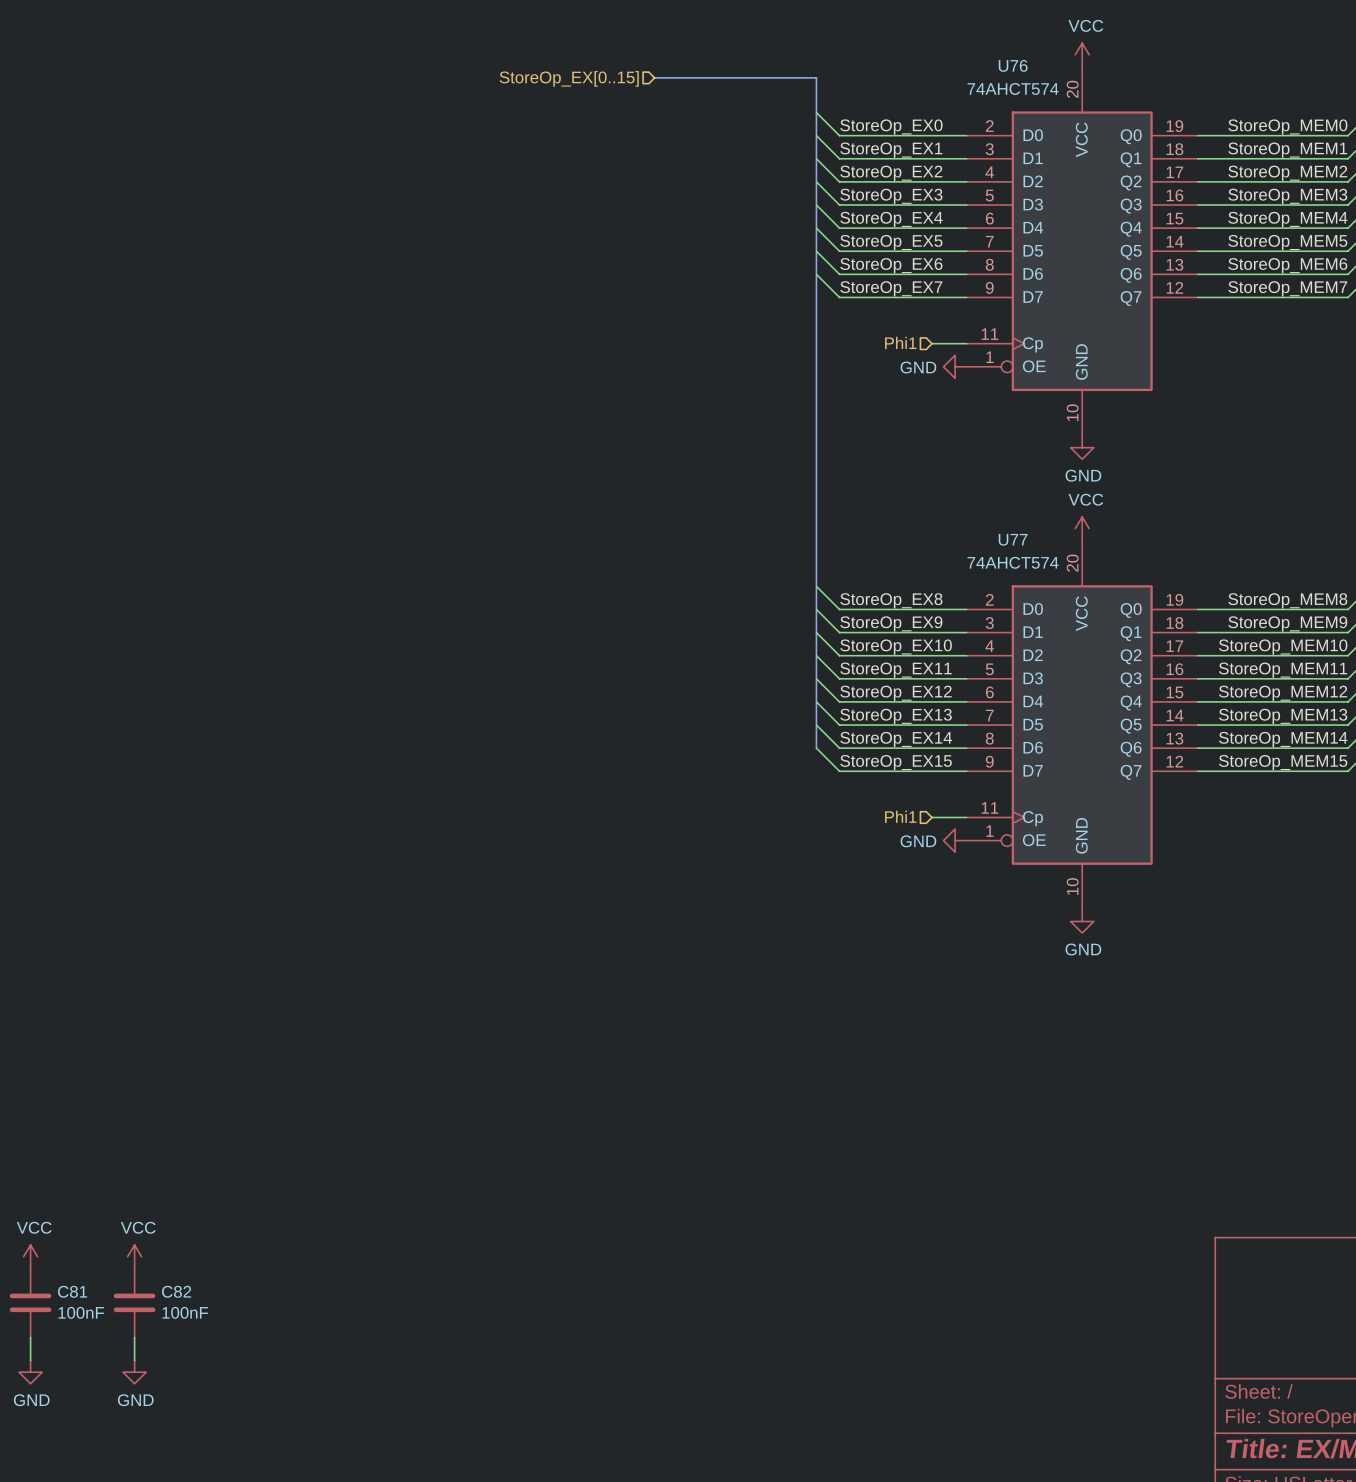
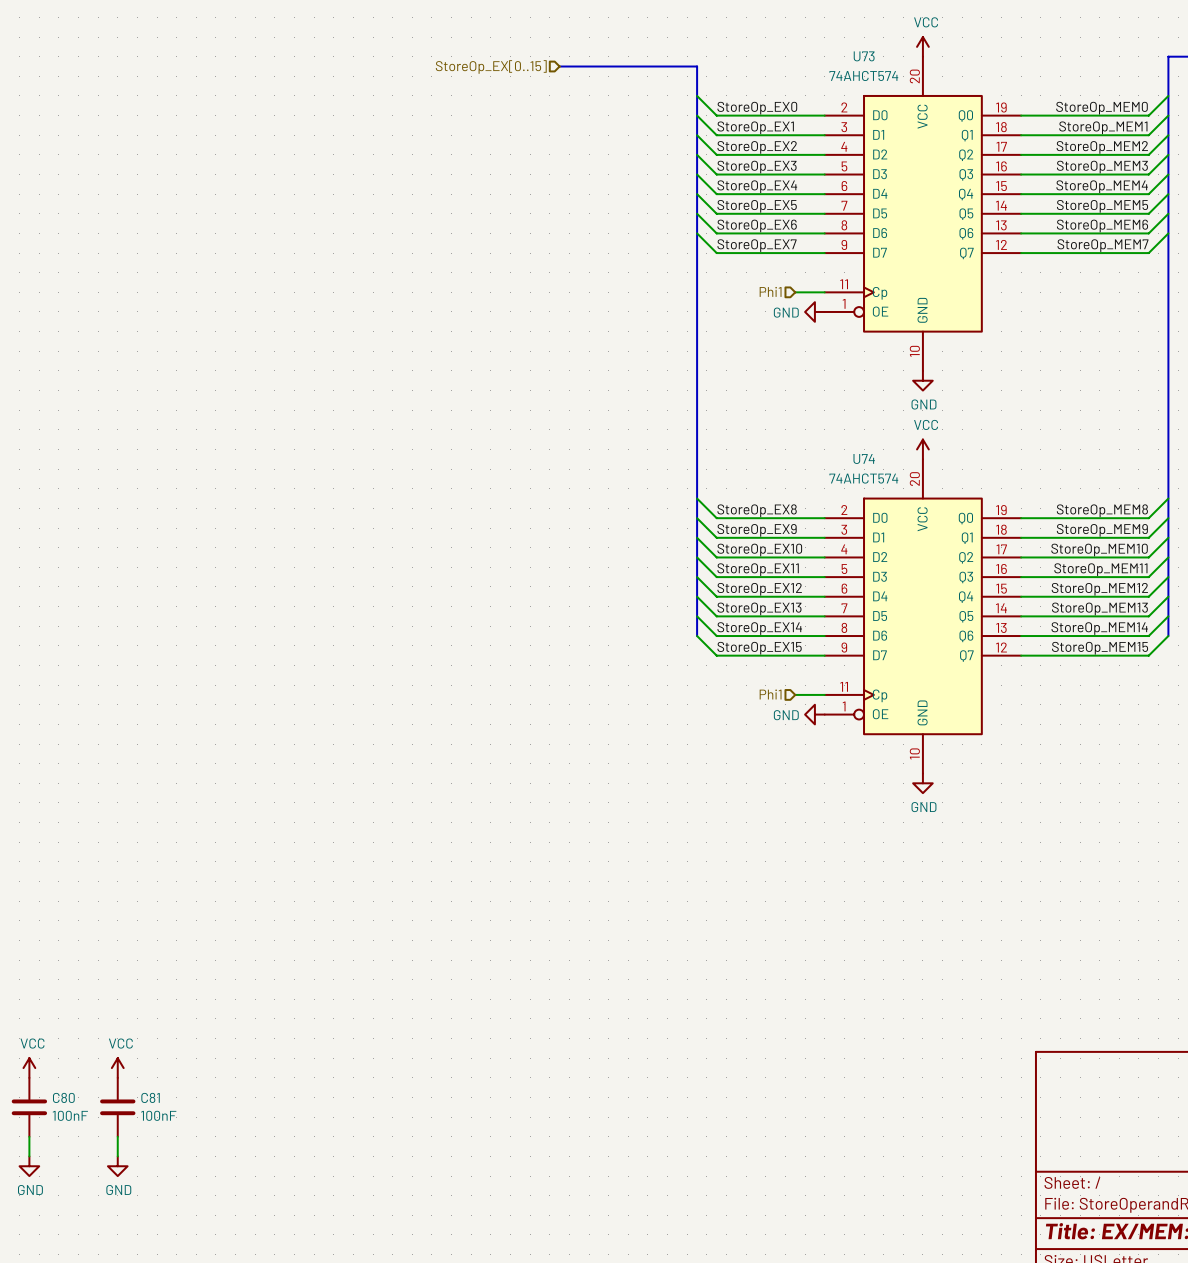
U76 name: U76 (1013, 65) -> U73 (864, 56)
U77 name: U77 (1013, 539) -> U74 (864, 458)
C81 name: C81 (72, 1291) -> C80 (63, 1097)
C82 name: C82 (176, 1291) -> C81 (150, 1097)

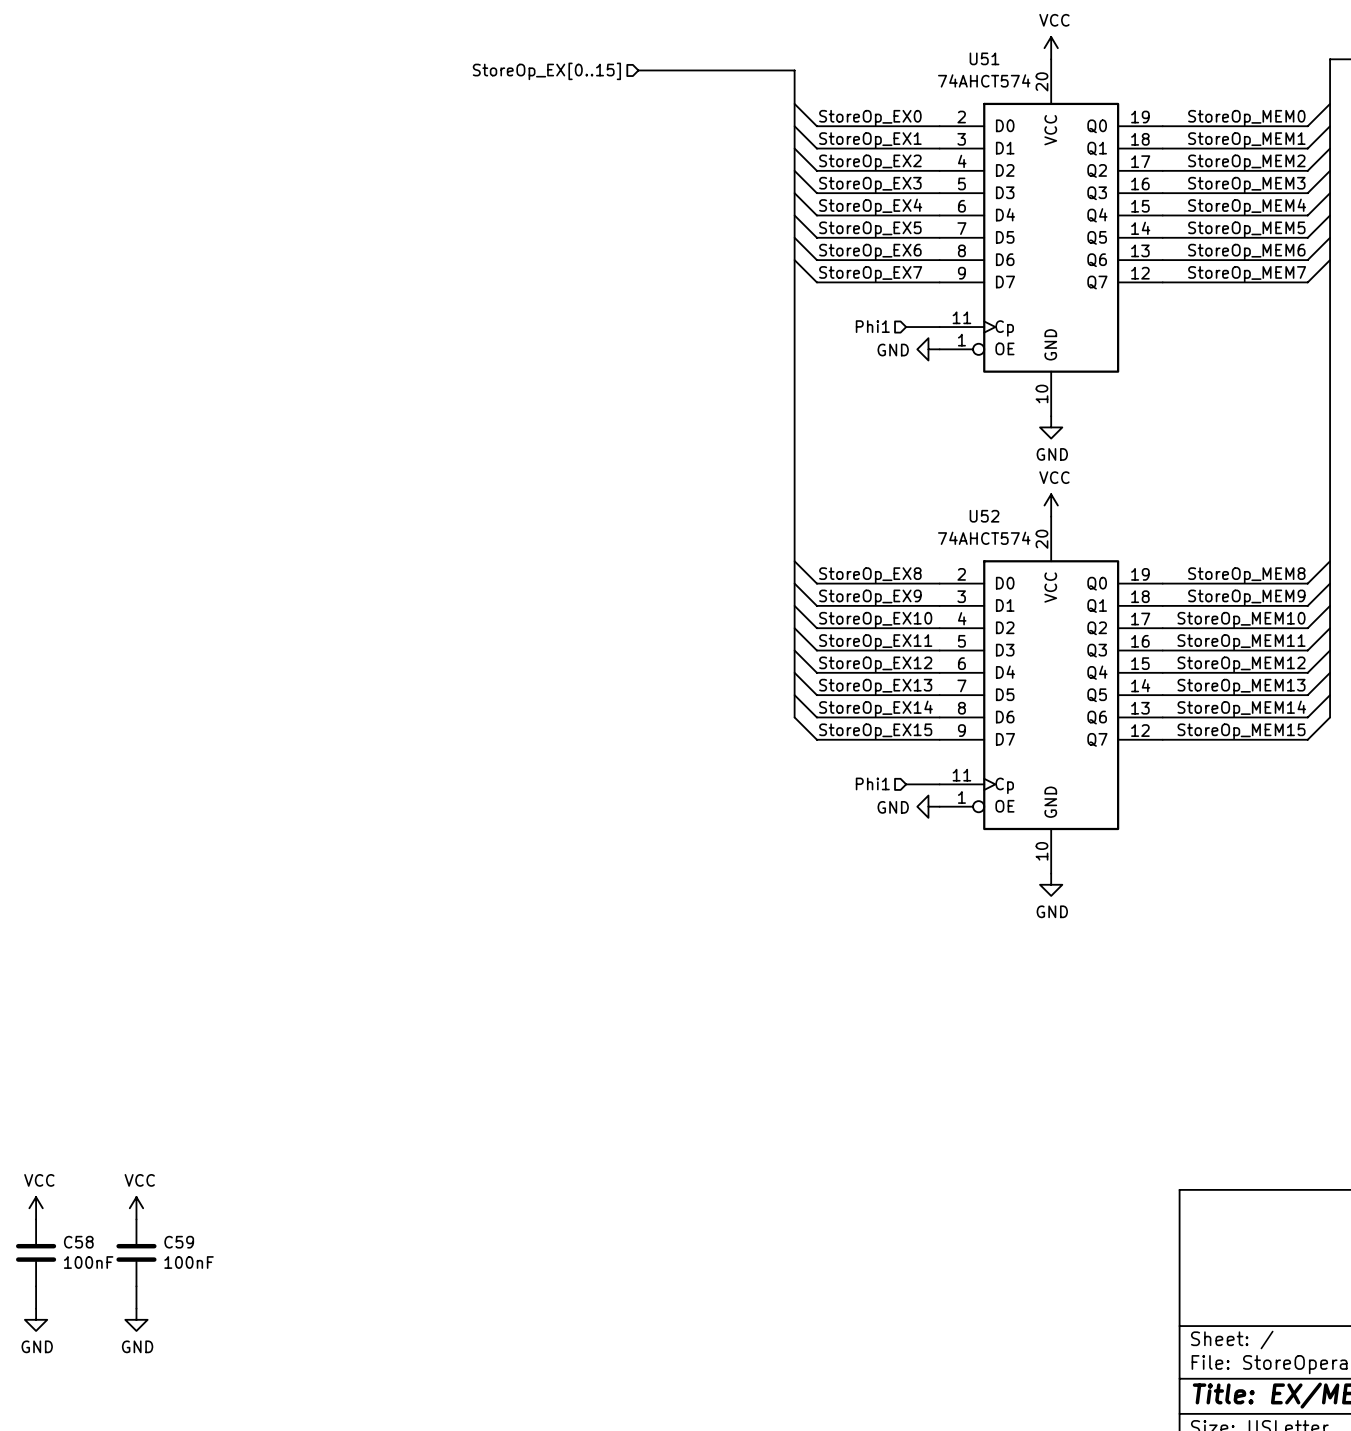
U73 name: U73 (864, 56) -> U51 (984, 58)
U74 name: U74 (864, 458) -> U52 (984, 516)
C80 name: C80 (63, 1097) -> C58 (78, 1242)
C81 name: C81 (150, 1097) -> C59 (179, 1242)

